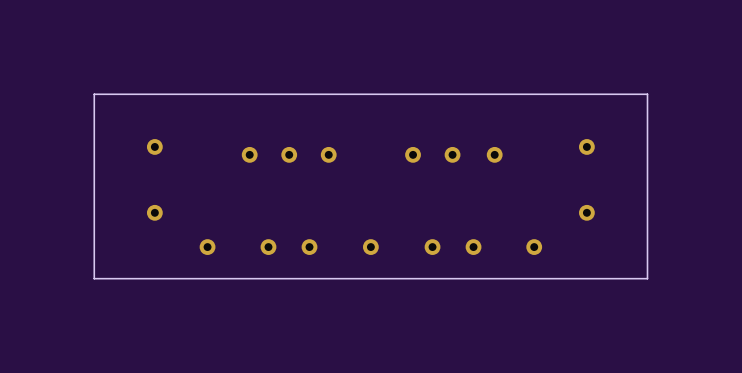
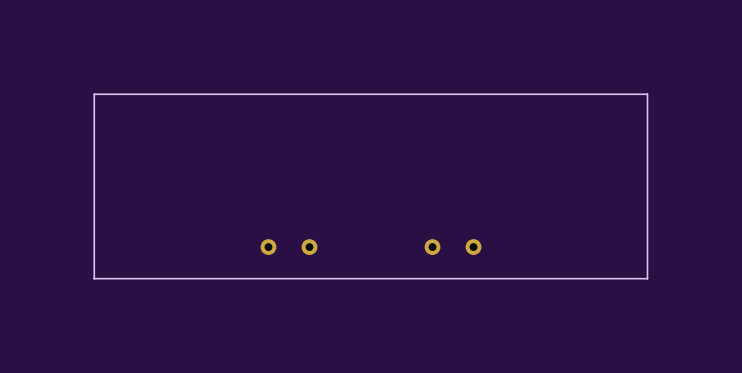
via: (154, 146) -> none
via: (586, 146) -> none
via: (249, 154) -> none
via: (289, 154) -> none
via: (328, 154) -> none
via: (413, 154) -> none
via: (452, 154) -> none
via: (494, 154) -> none
via: (154, 212) -> none
via: (586, 212) -> none
via: (207, 247) -> none
via: (370, 247) -> none
via: (534, 247) -> none

